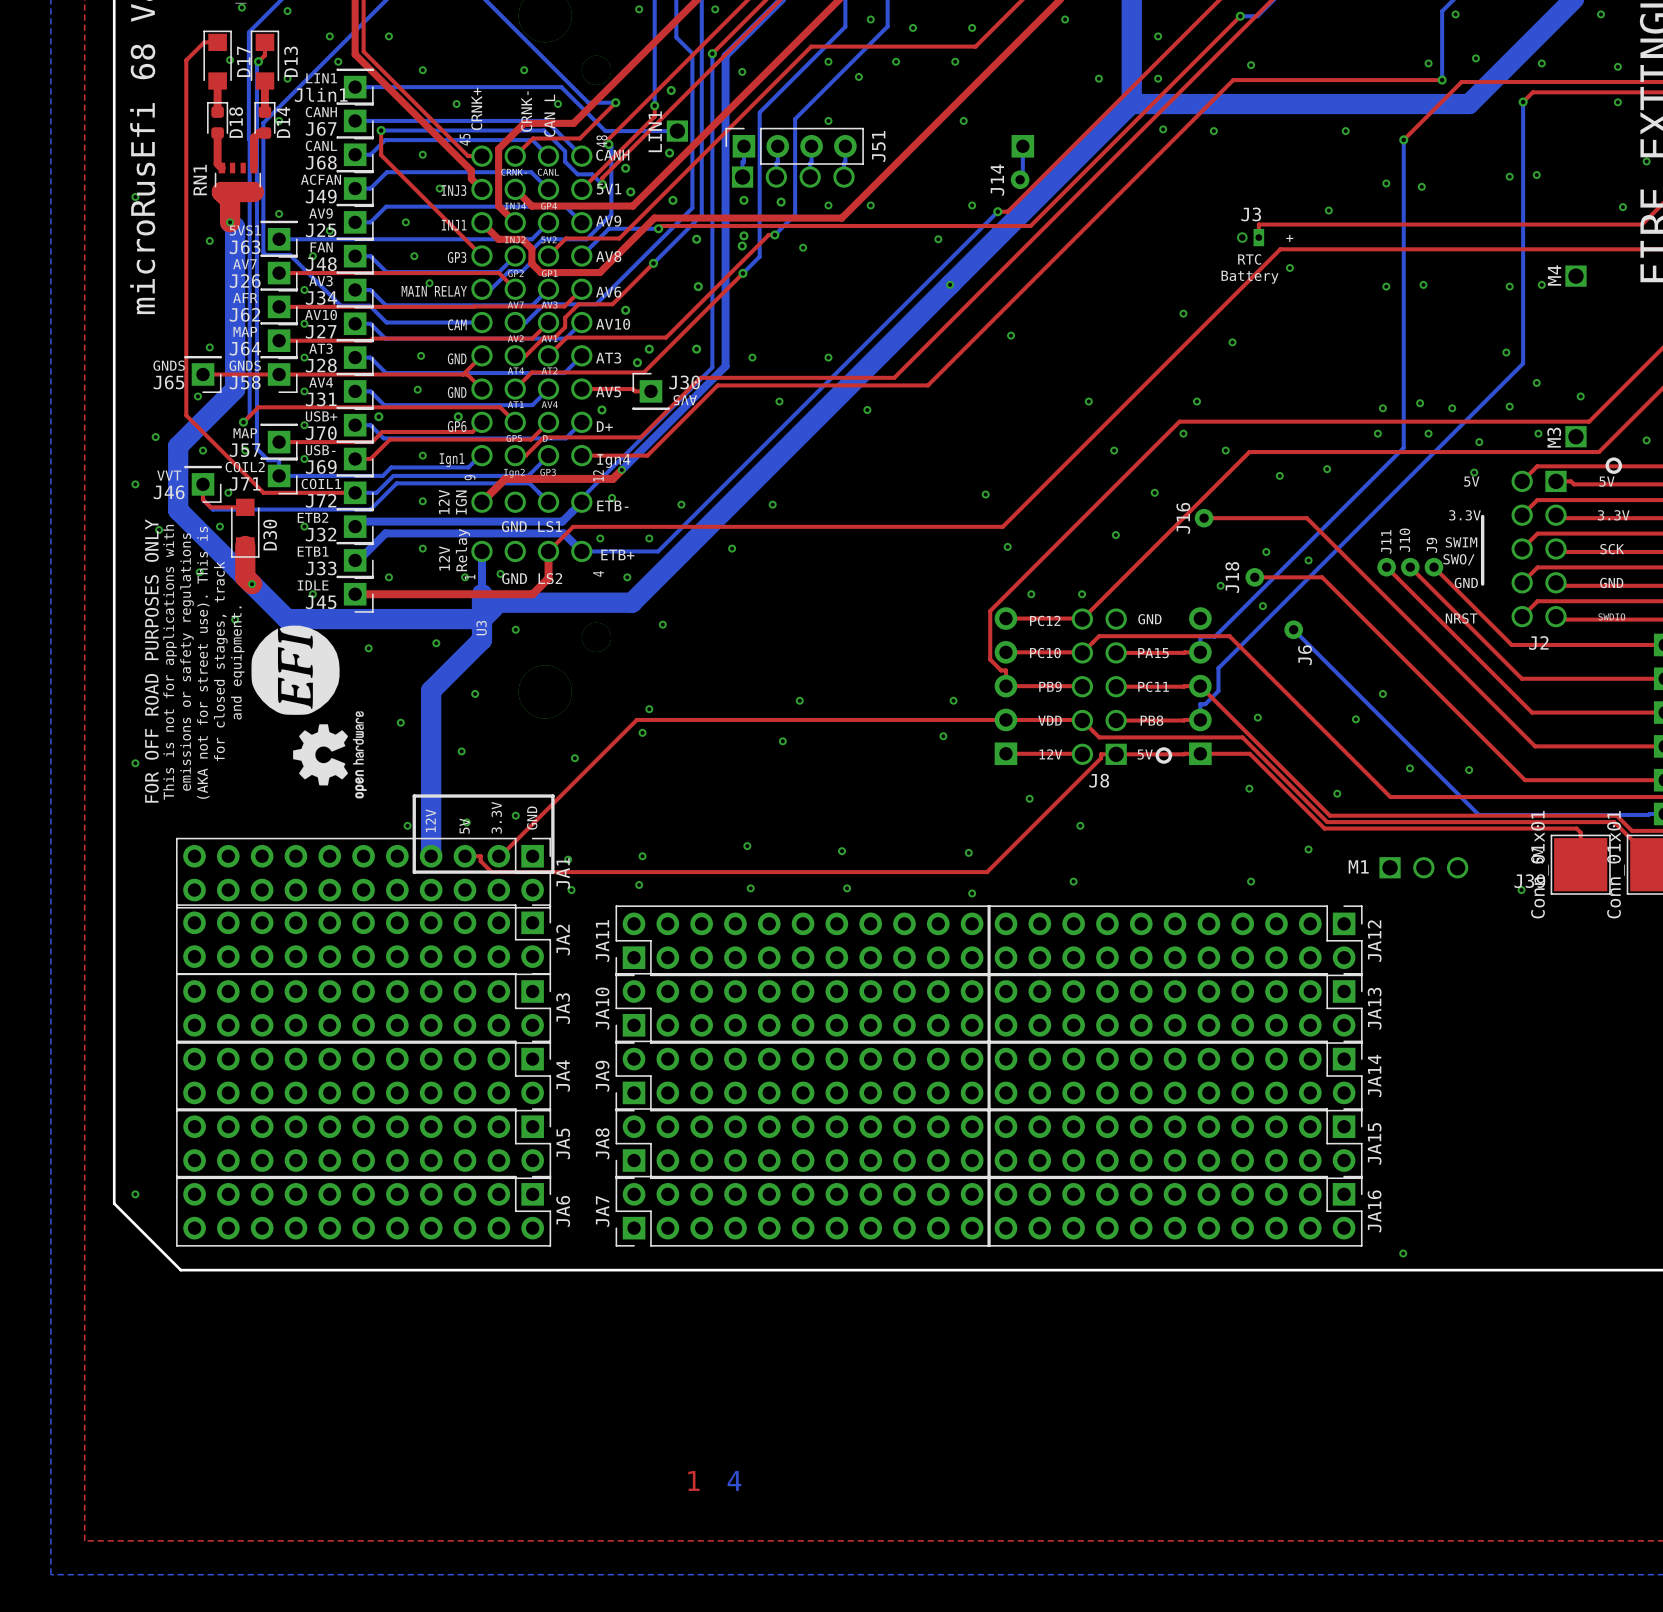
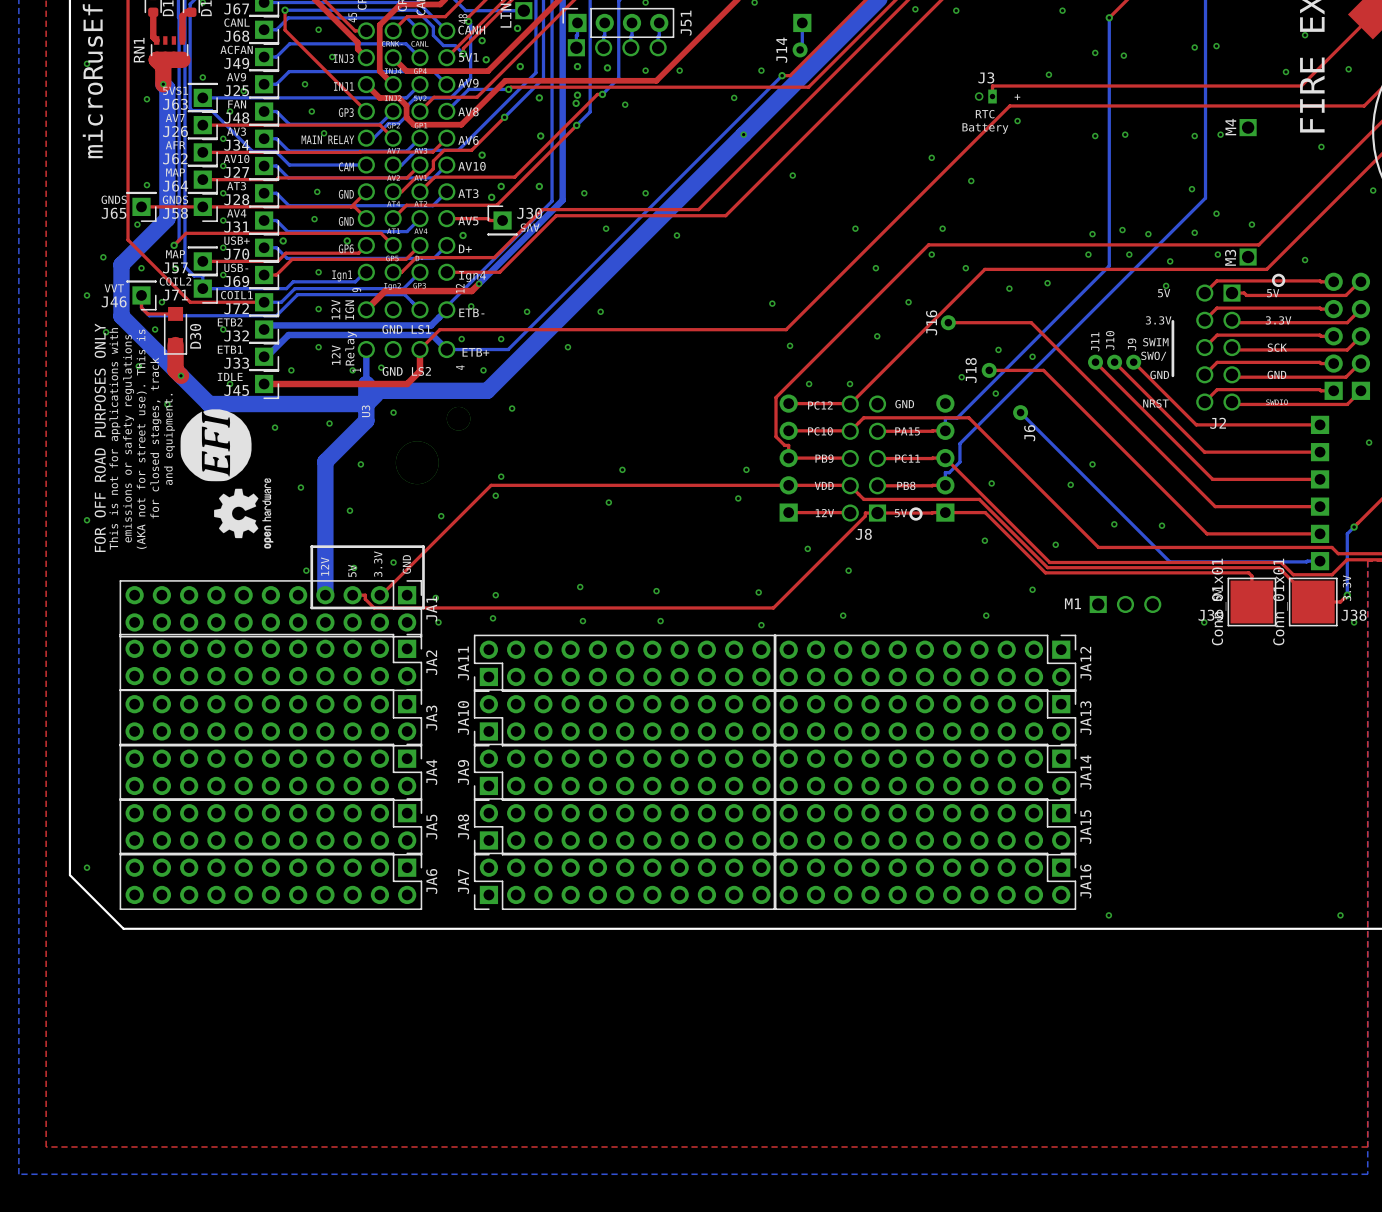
text: 1 (693, 1480) -> none
text: 4 (734, 1480) -> none

